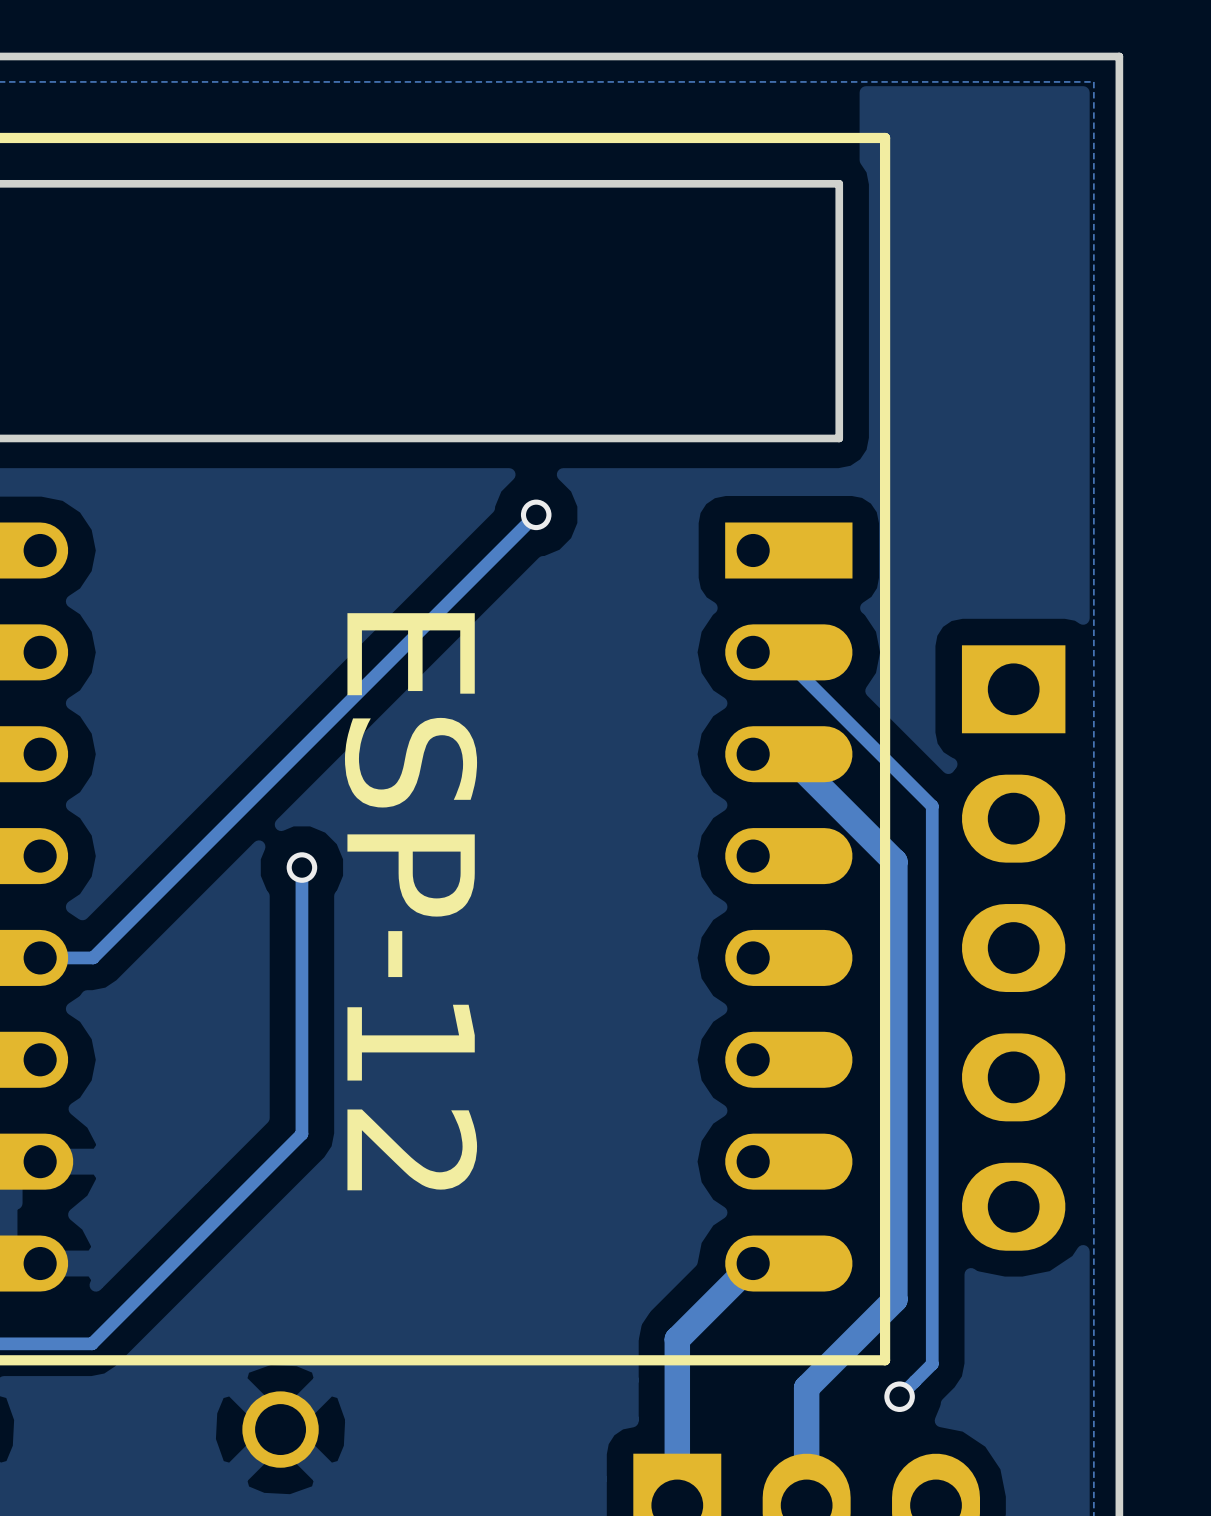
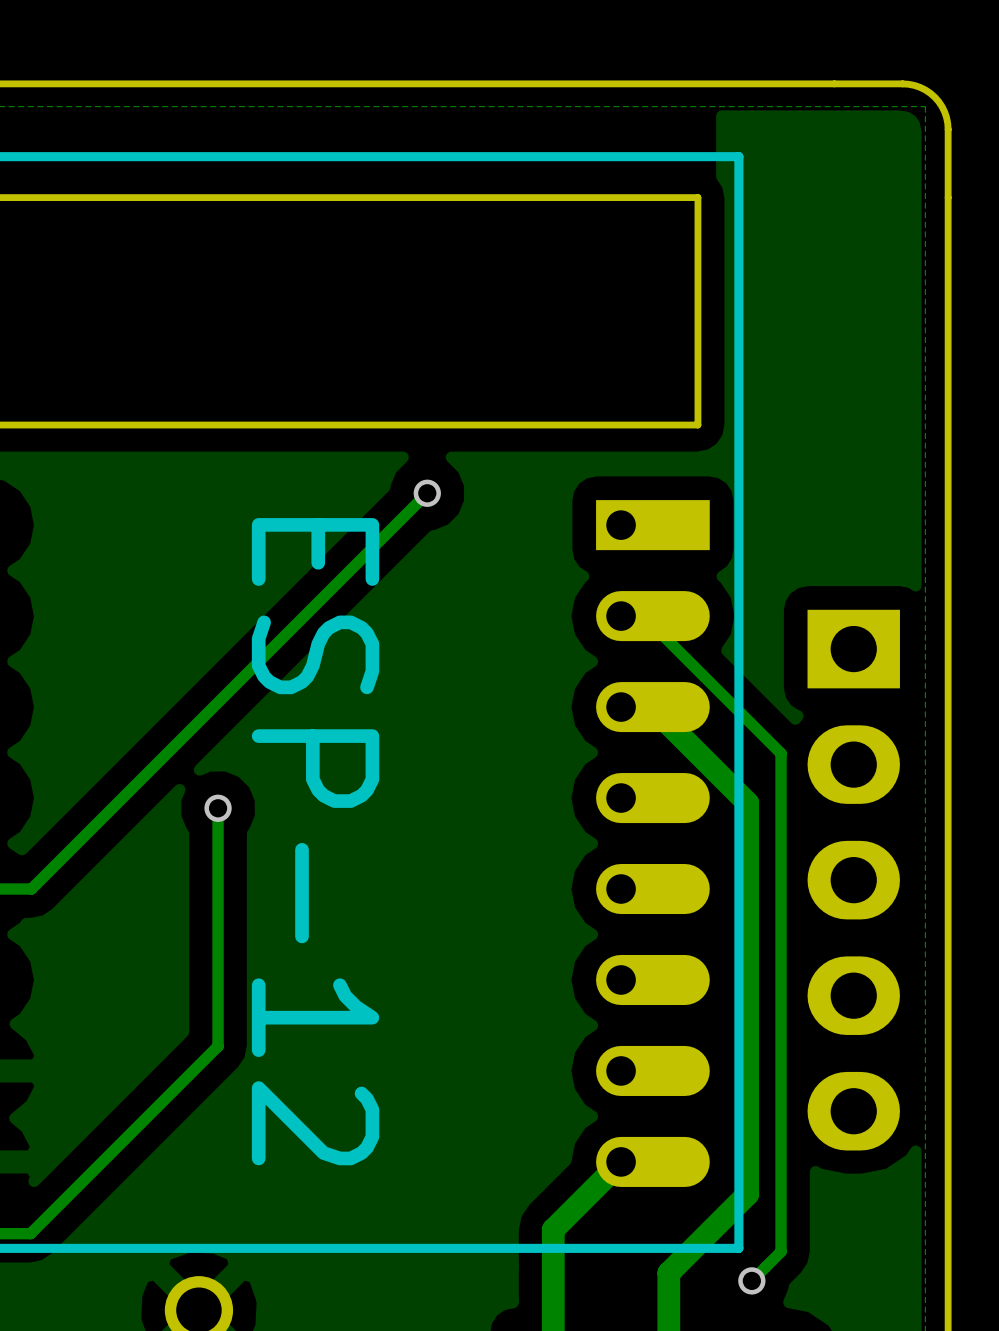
board edge: (1068, 56) (1119, 56) (1119, 107) -> (902, 83) (920, 87) (934, 97) (944, 111) (948, 129)

